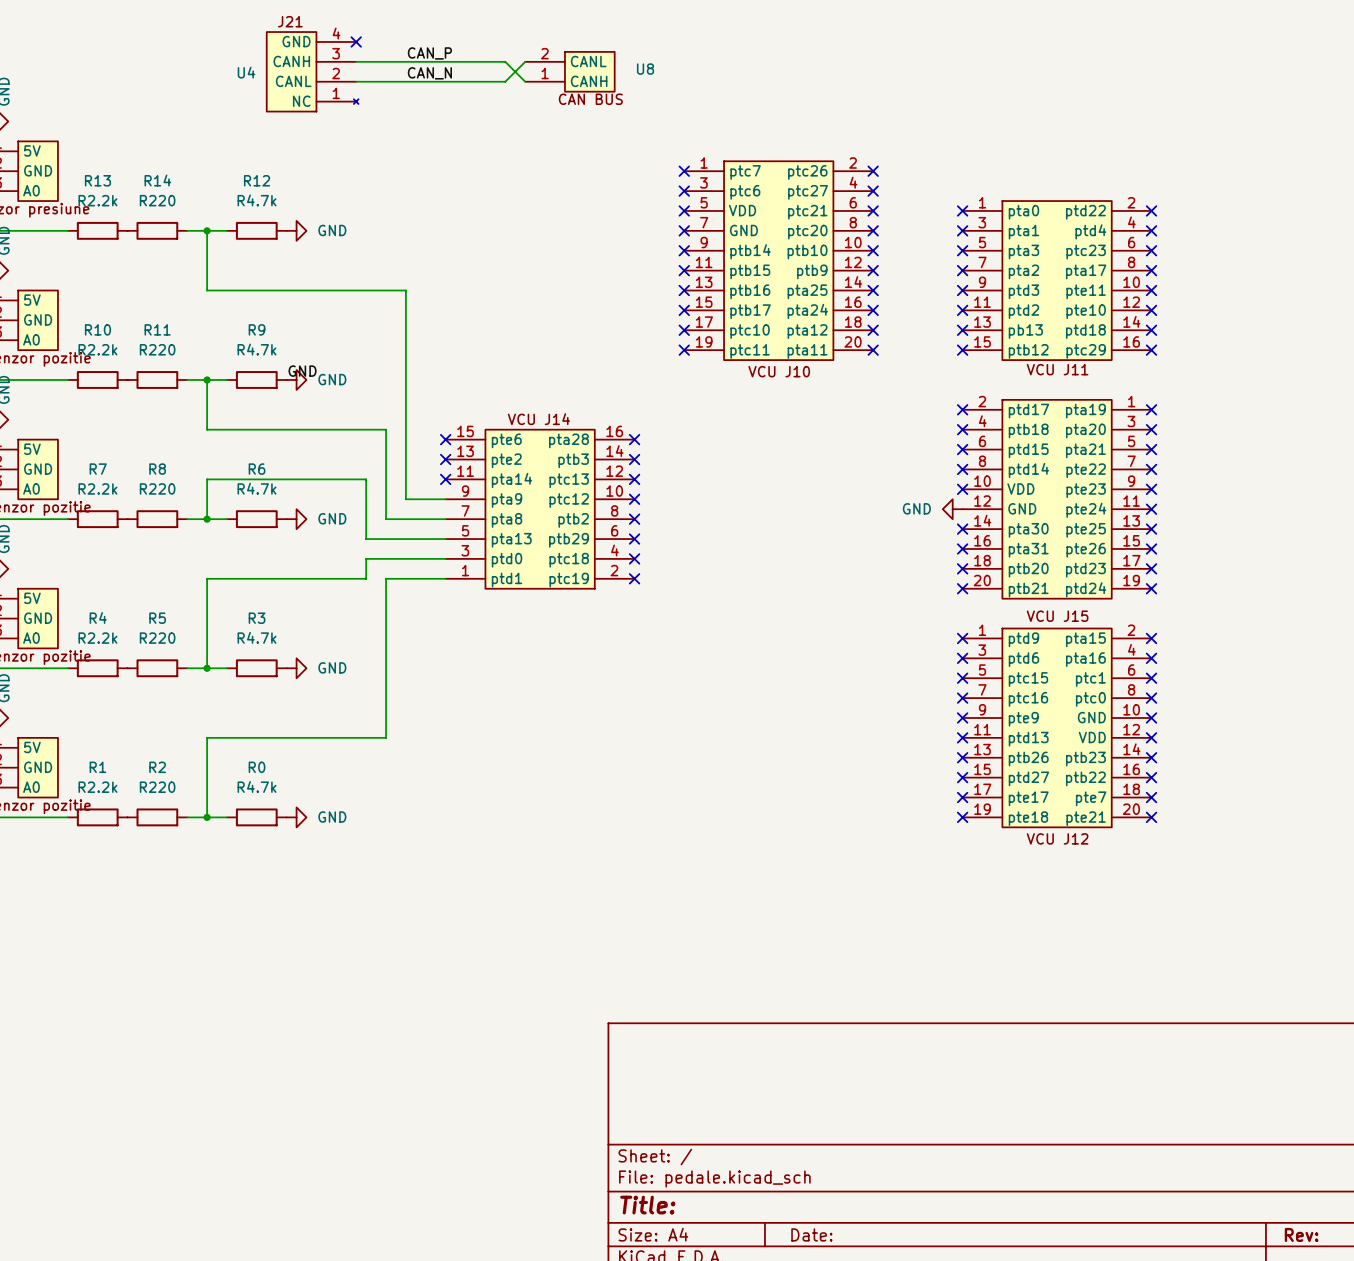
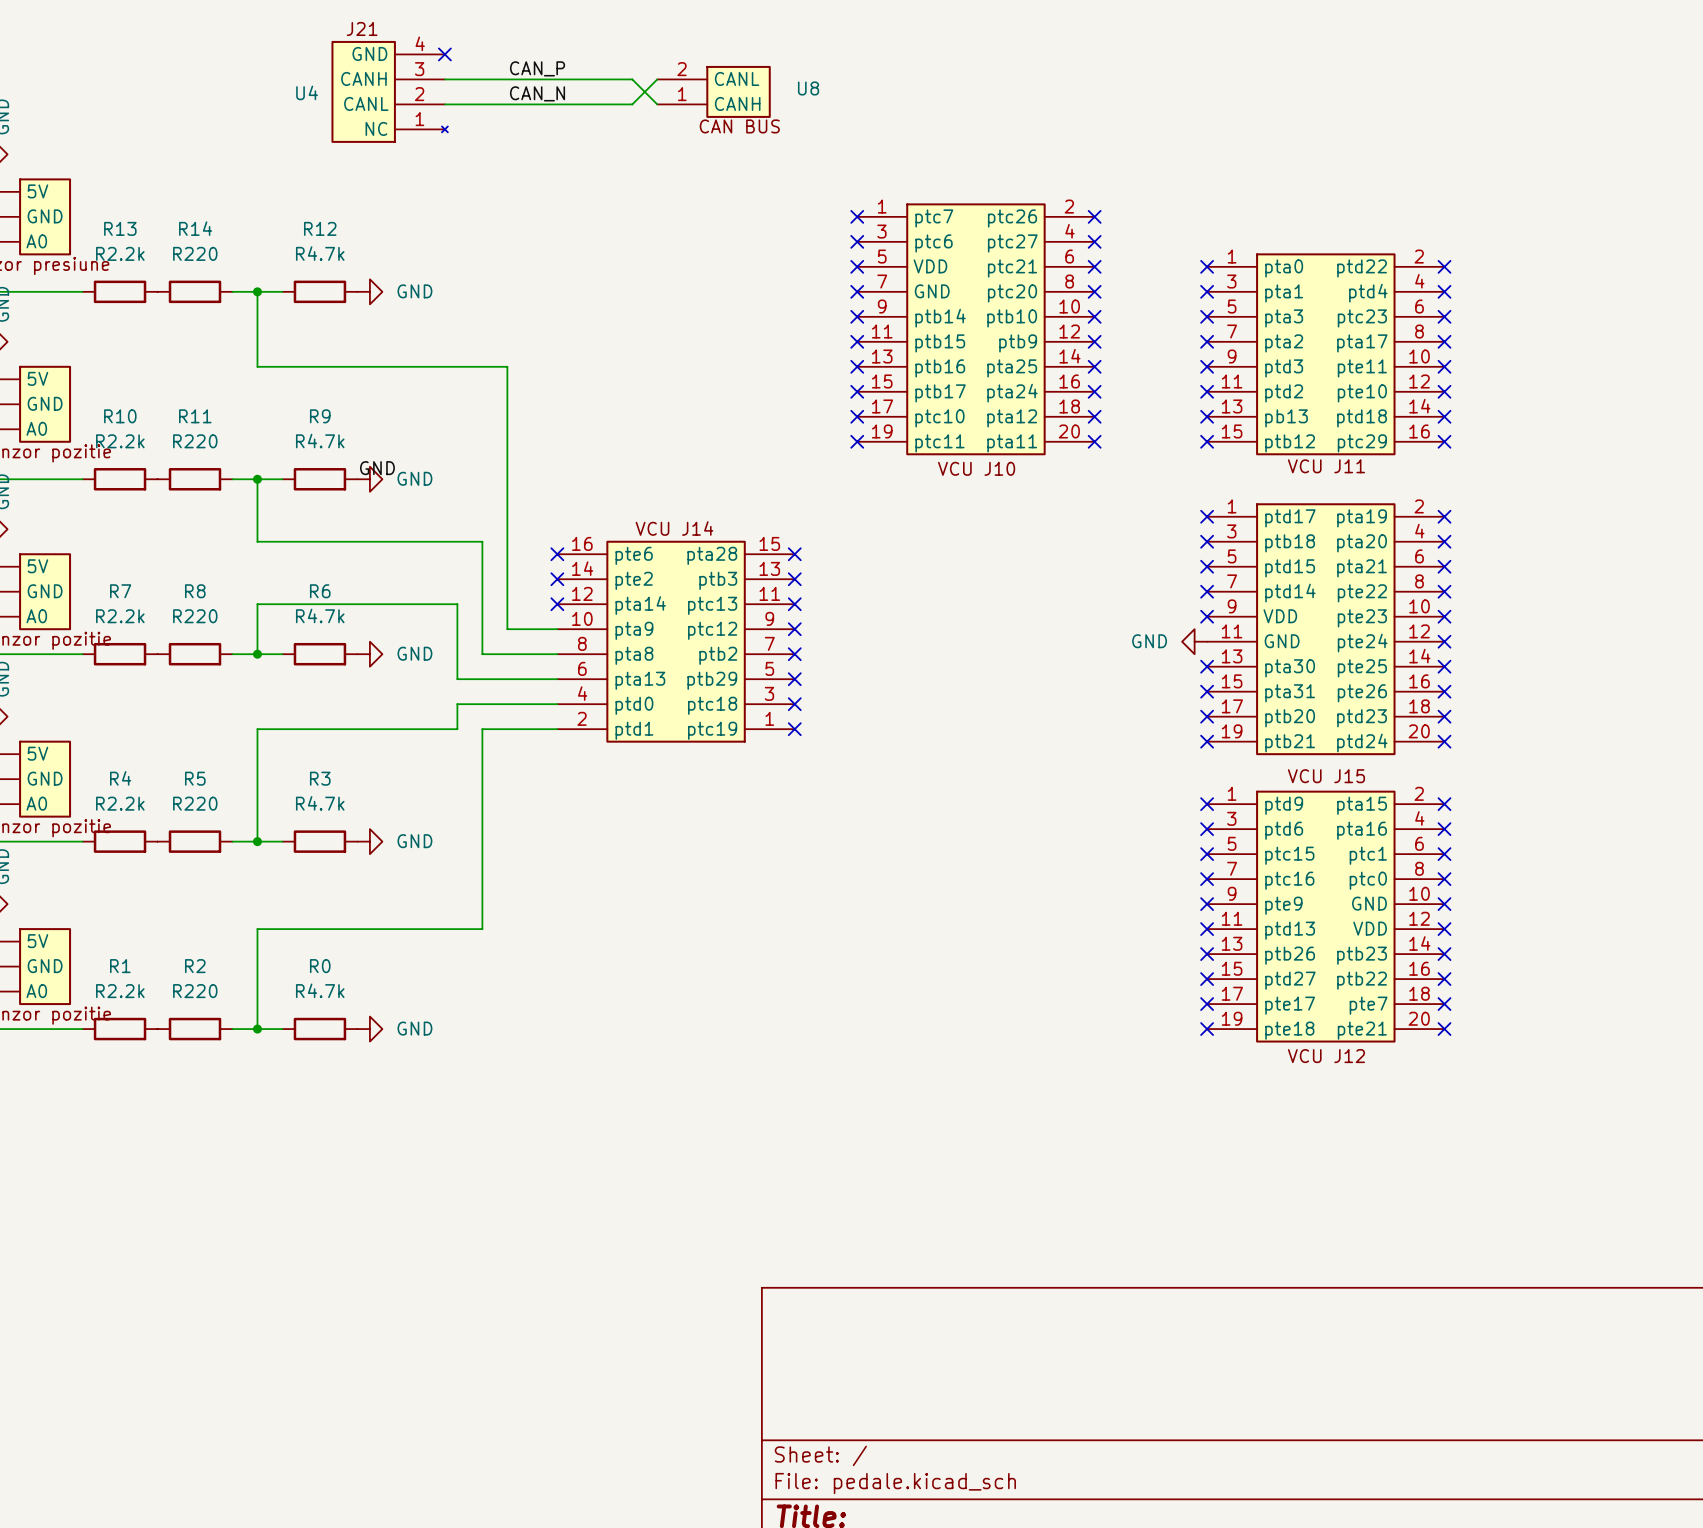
part symbol: [962, 399, 1152, 600] -> [1207, 503, 1445, 756]
part symbol: [445, 428, 635, 590] -> [557, 540, 795, 743]

